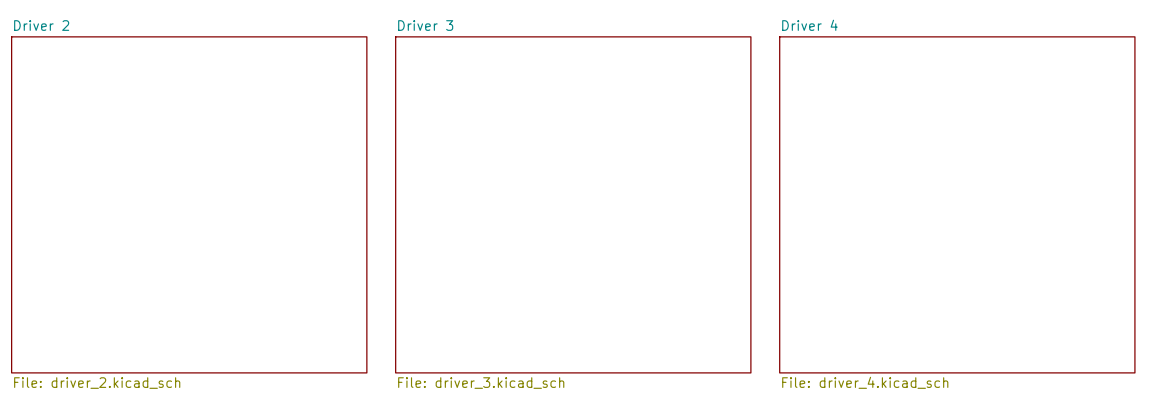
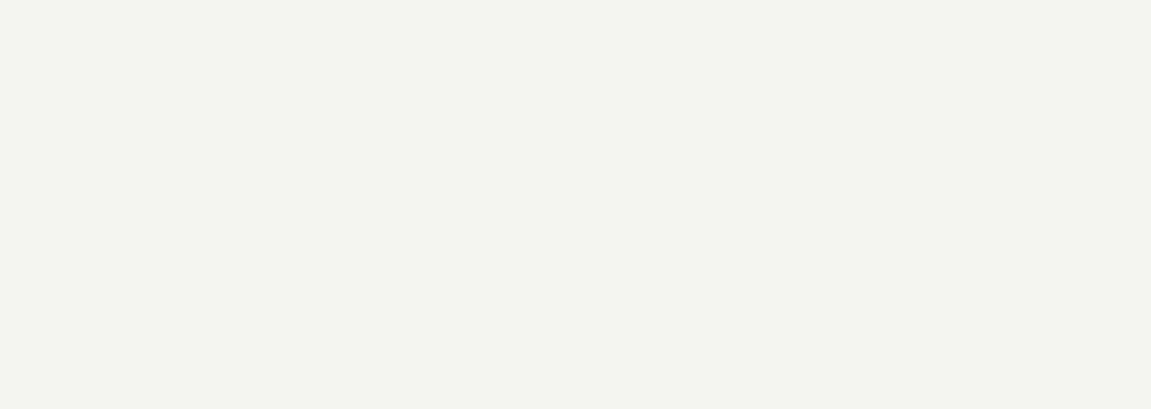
sheet Driver 2: File: driver_2.kicad_sch (189, 204) -> none
sheet Driver 3: File: driver_3.kicad_sch (573, 204) -> none
sheet Driver 4: File: driver_4.kicad_sch (957, 204) -> none

